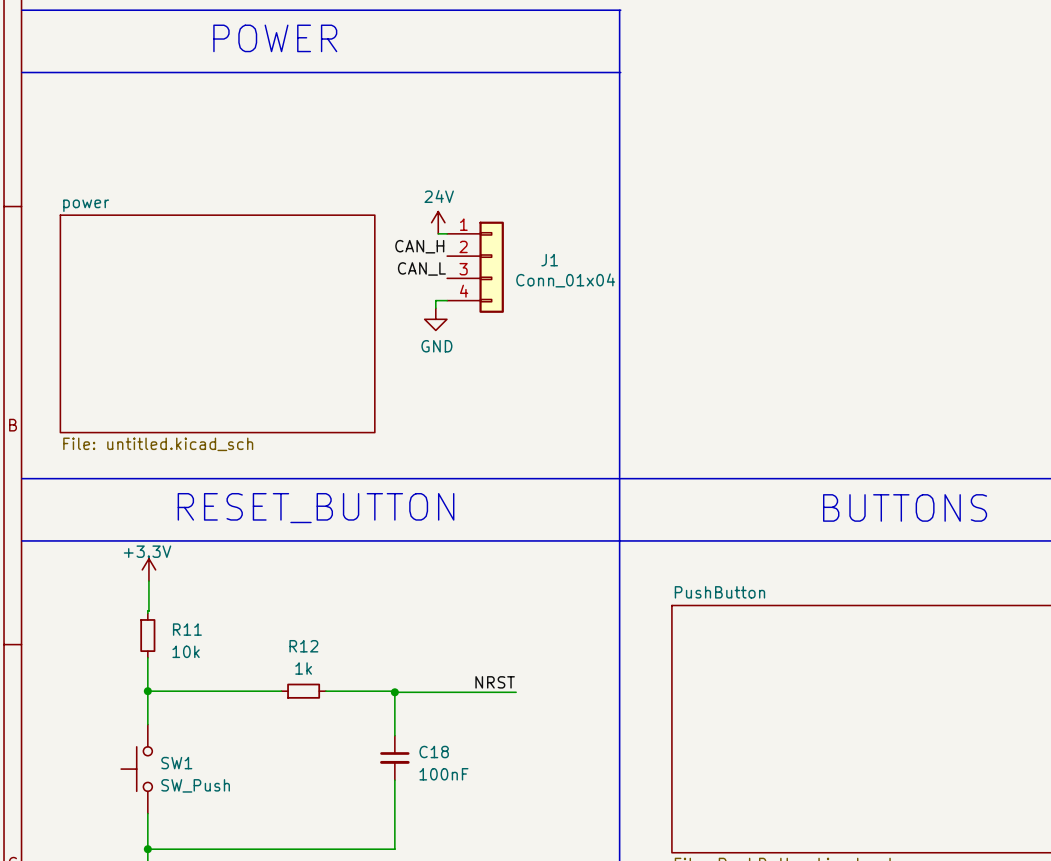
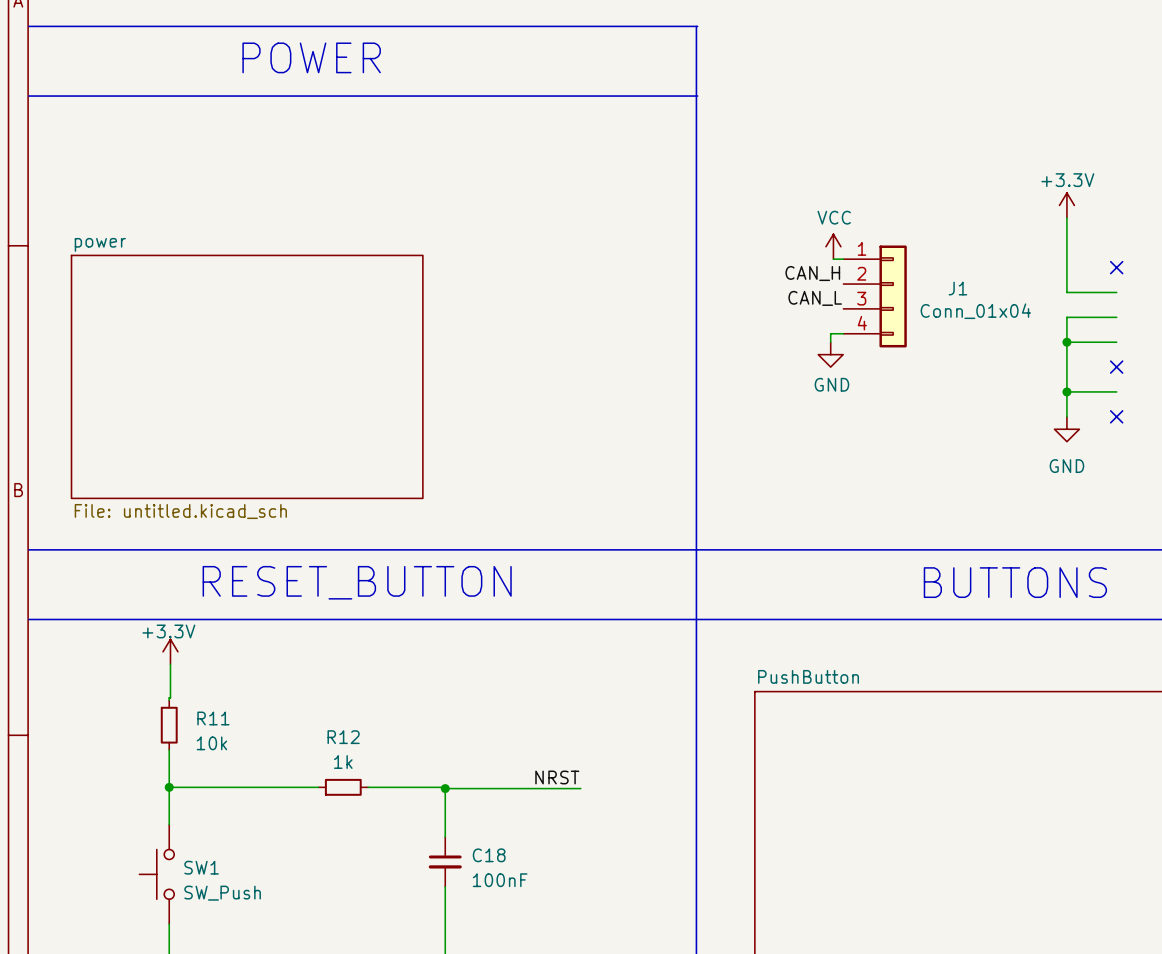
power symbol: none -> +3.3V (1066, 205)
wire: none -> (1066, 217) (1066, 292) (1116, 292)
power symbol: none -> VCC (833, 246)
wire: none -> (833, 259) (843, 259)
power symbol: 24V (438, 222) -> none
no-connect mark: none -> (1116, 267)
label: none -> CAN_H (812, 273)
wire: (438, 233) (447, 233) -> none
label: CAN_H (419, 246) -> none
label: none -> CAN_L (815, 298)
J1 position: (475, 267) -> (875, 296)
label: CAN_L (421, 268) -> none
wire: none -> (1116, 317) (1066, 317) (1066, 416)
wire: none -> (843, 333) (830, 333) (830, 342)
wire: none -> (1066, 342) (1116, 342)
junction: none -> (1066, 342)
wire: (447, 300) (435, 300) (435, 308) -> none
power symbol: none -> GND (830, 354)
no-connect mark: none -> (1116, 367)
power symbol: GND (435, 319) -> none
wire: none -> (1066, 391) (1116, 391)
junction: none -> (1066, 391)
no-connect mark: none -> (1116, 416)
power symbol: none -> GND (1066, 429)

